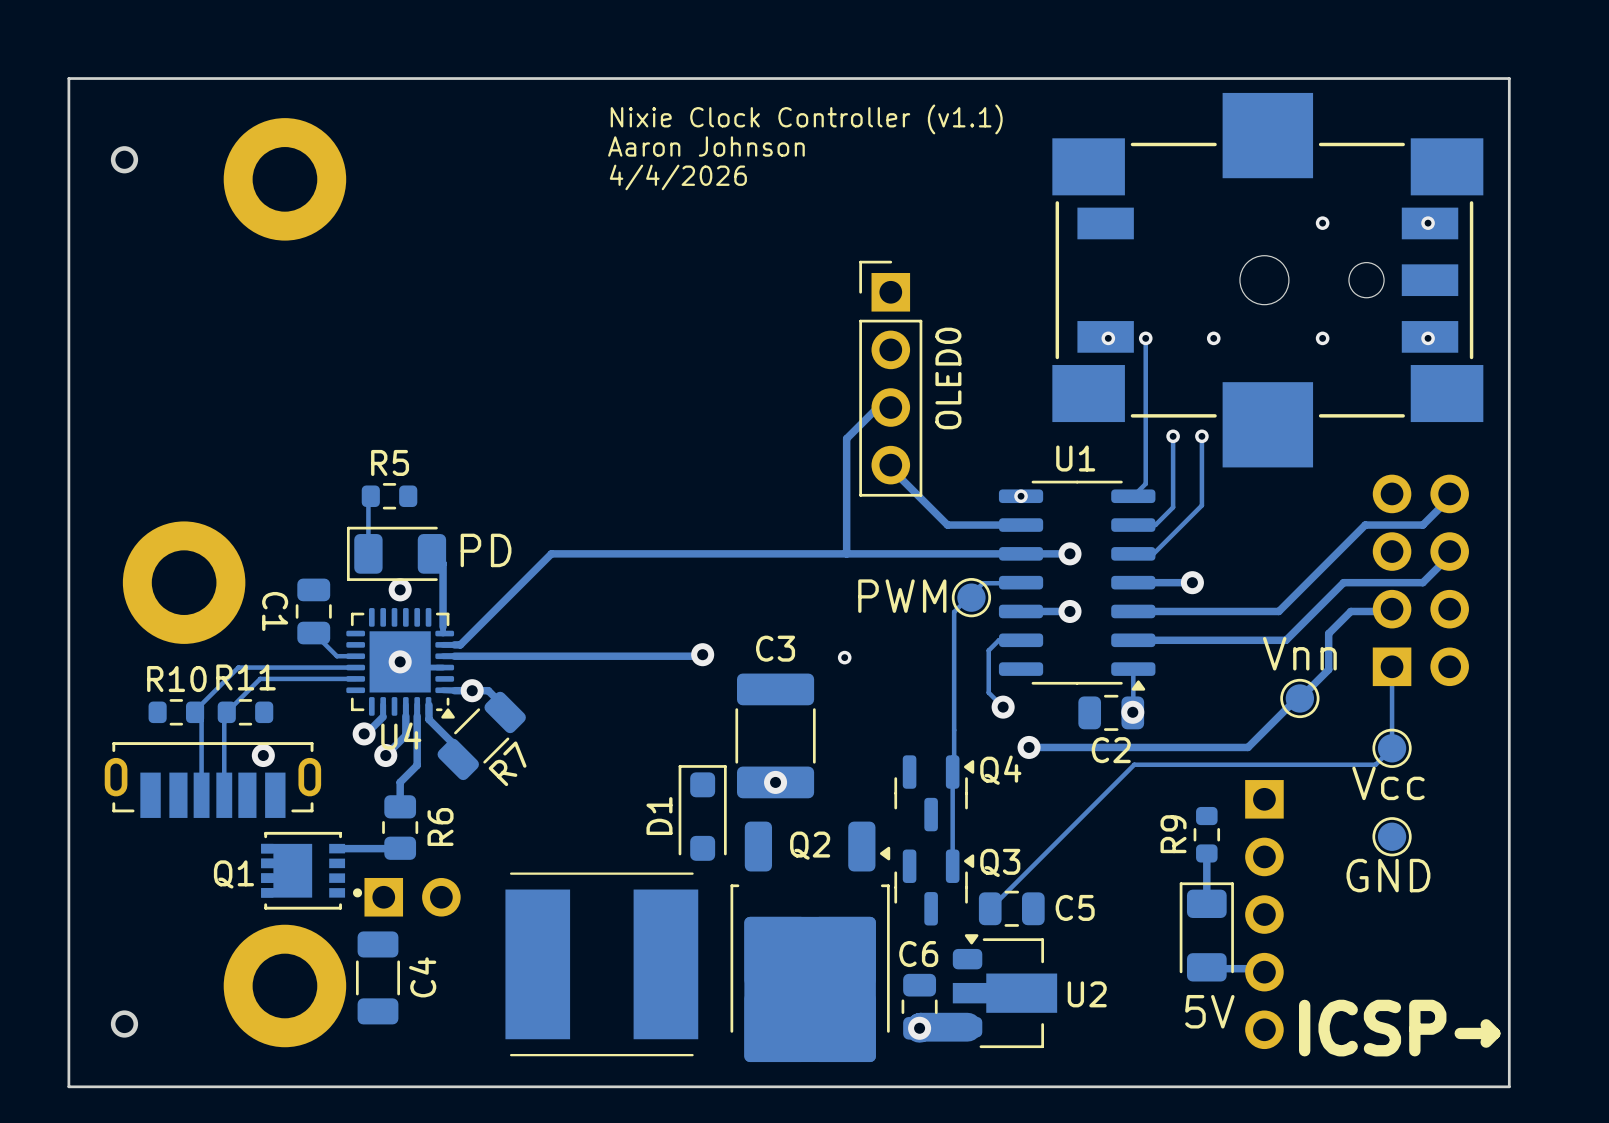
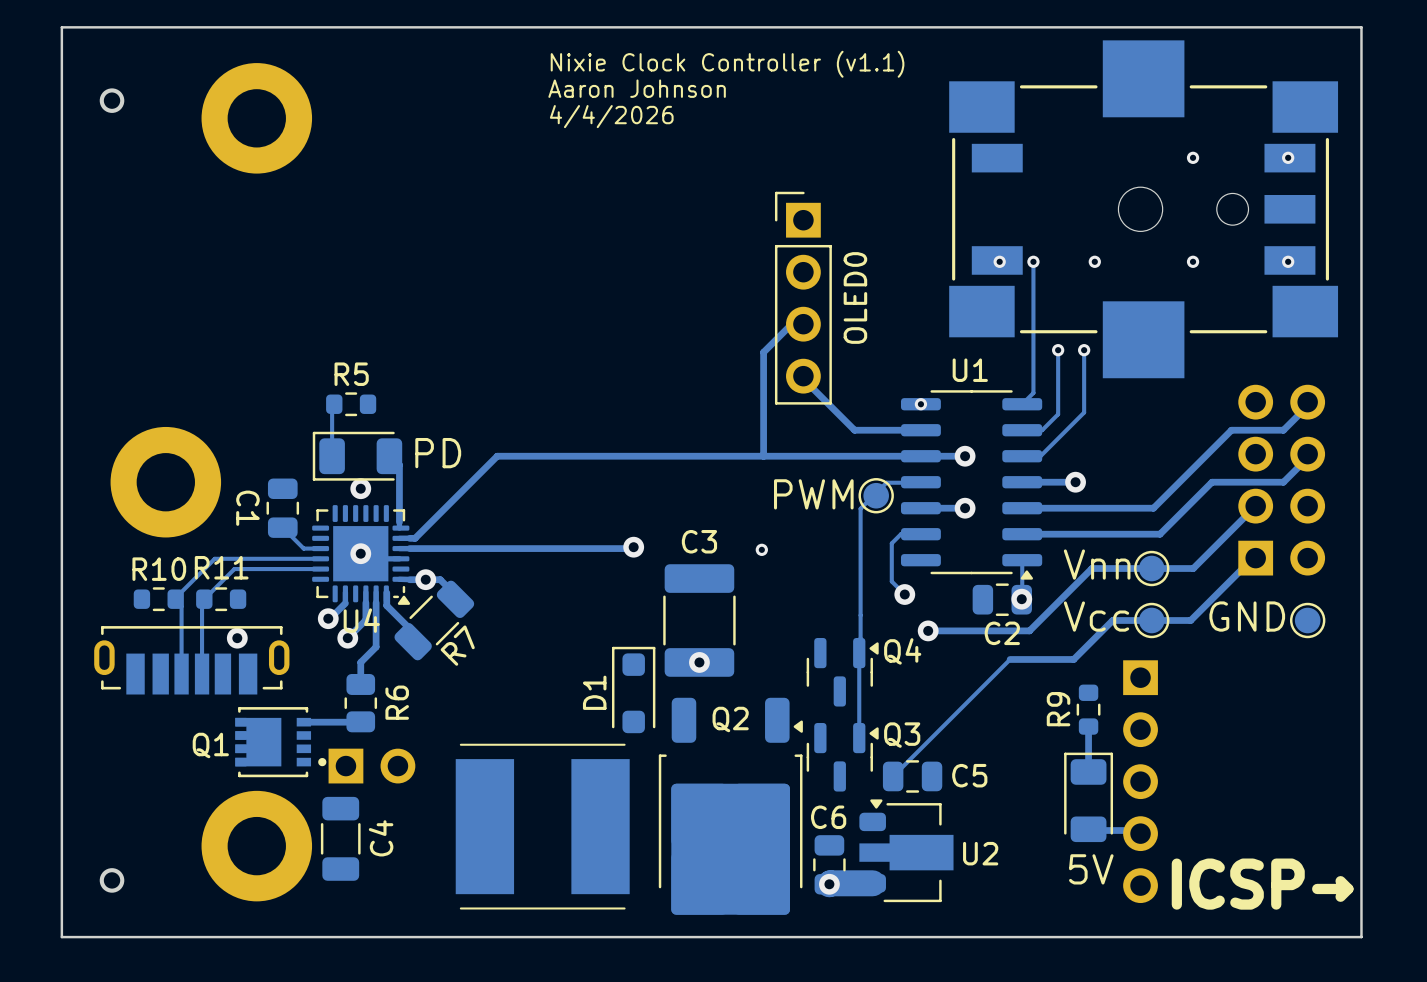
track: (1394, 611) (1350, 611) (1328, 633) (1328, 669) (1248, 747) (1141, 747) -> (1255, 506) (1193, 568) (1091, 568) (1029, 630)
text position: Vnn (1299, 653) -> Vnn (1097, 564)
track: (1392, 666) (1392, 748) (1375, 764) (1134, 764) (1119, 779) -> (1255, 558) (1253, 558) (1190, 620) (1112, 620) (1073, 659) (1010, 659)
part: none -> (1151, 568)
part: (1299, 698) -> none
part: none -> (1151, 620)
part: none -> (1307, 620)
part: (1392, 748) -> none
text position: Vcc (1388, 783) -> Vcc (1096, 616)
part: (1392, 836) -> none
text position: GND (1388, 875) -> GND (1247, 616)

